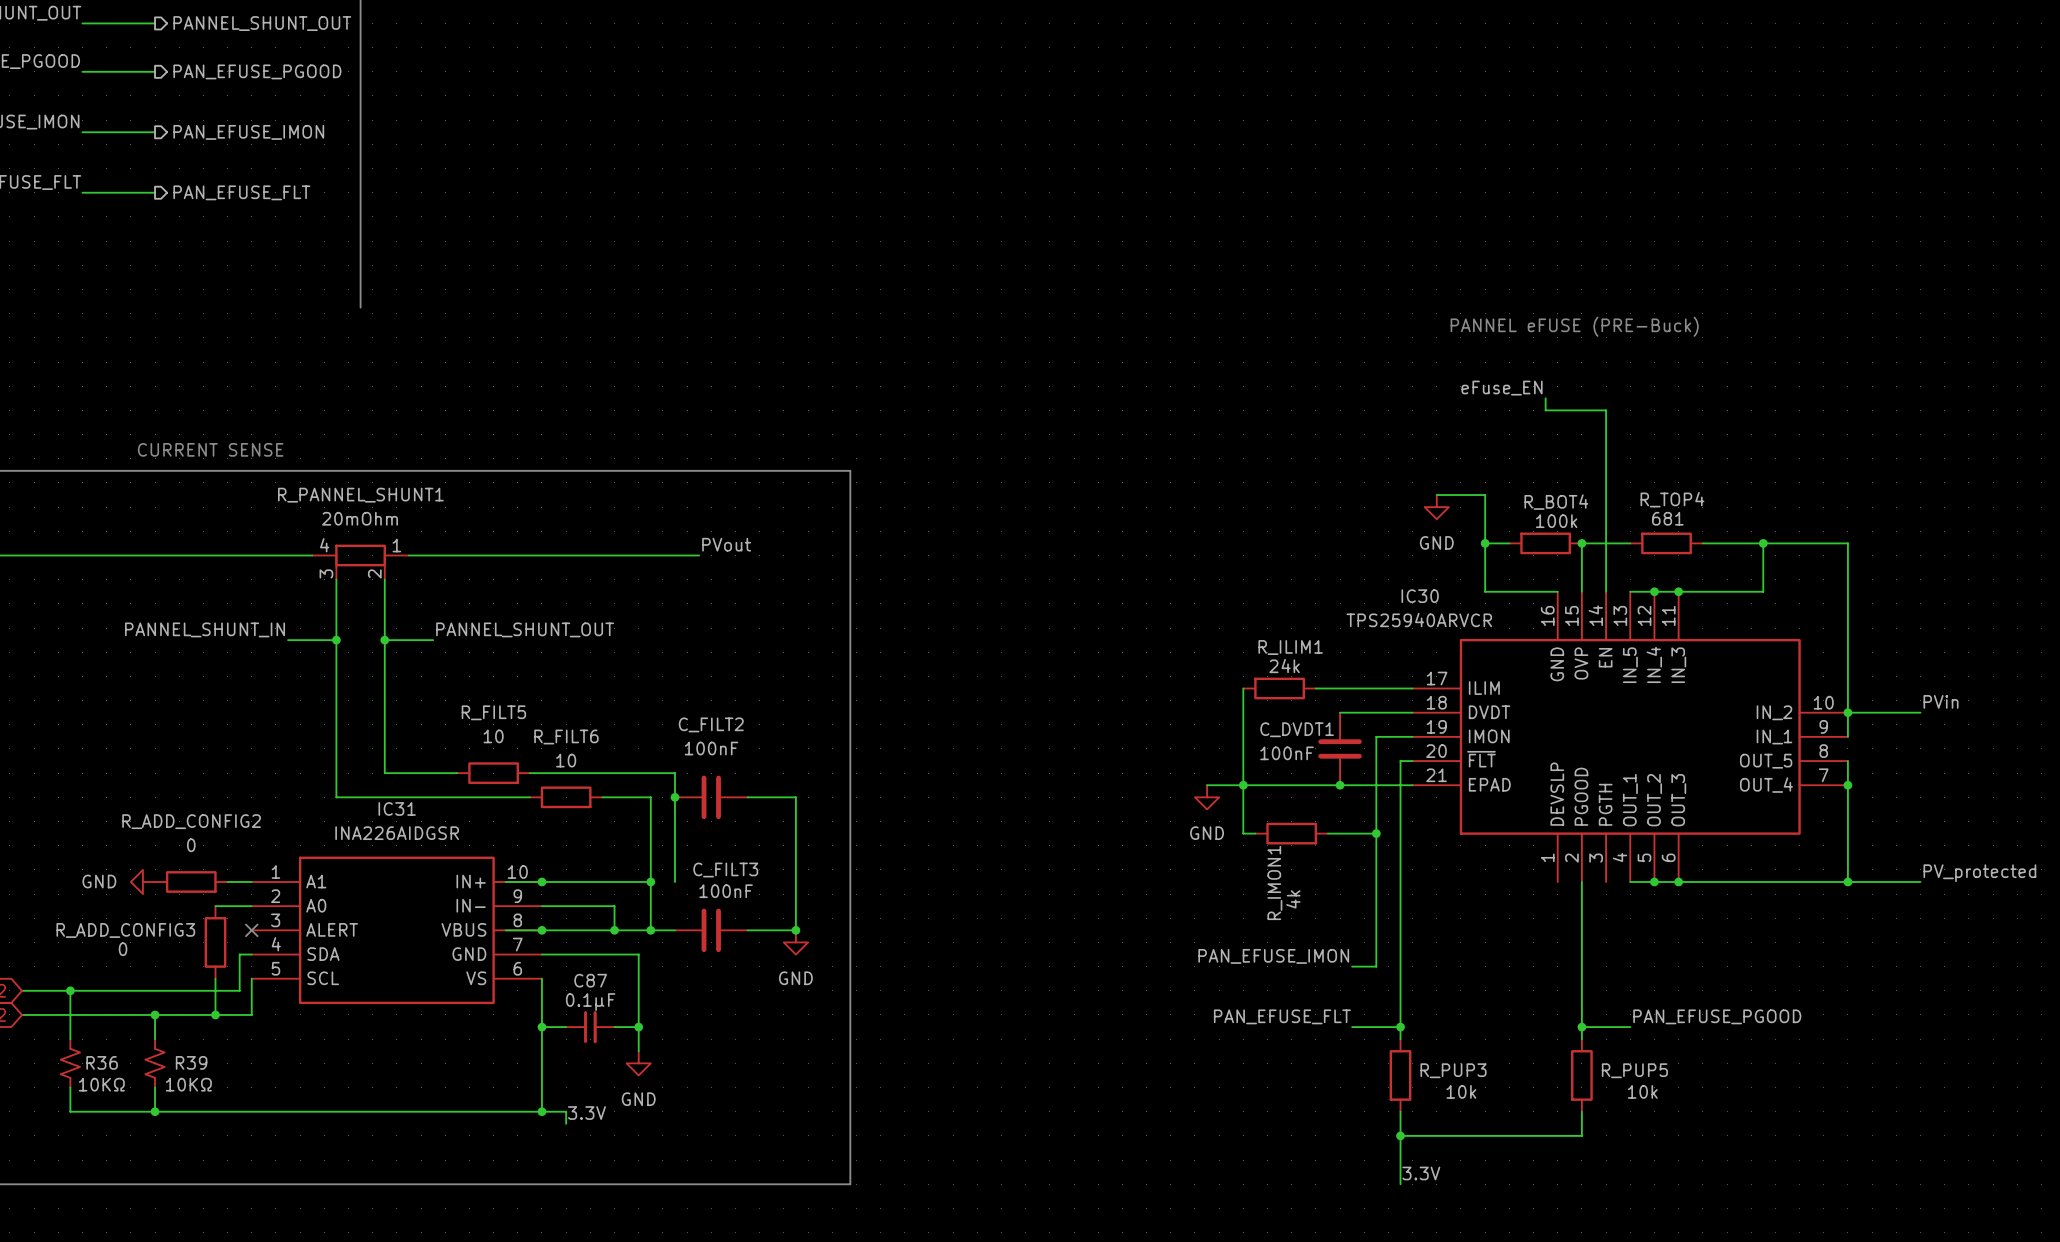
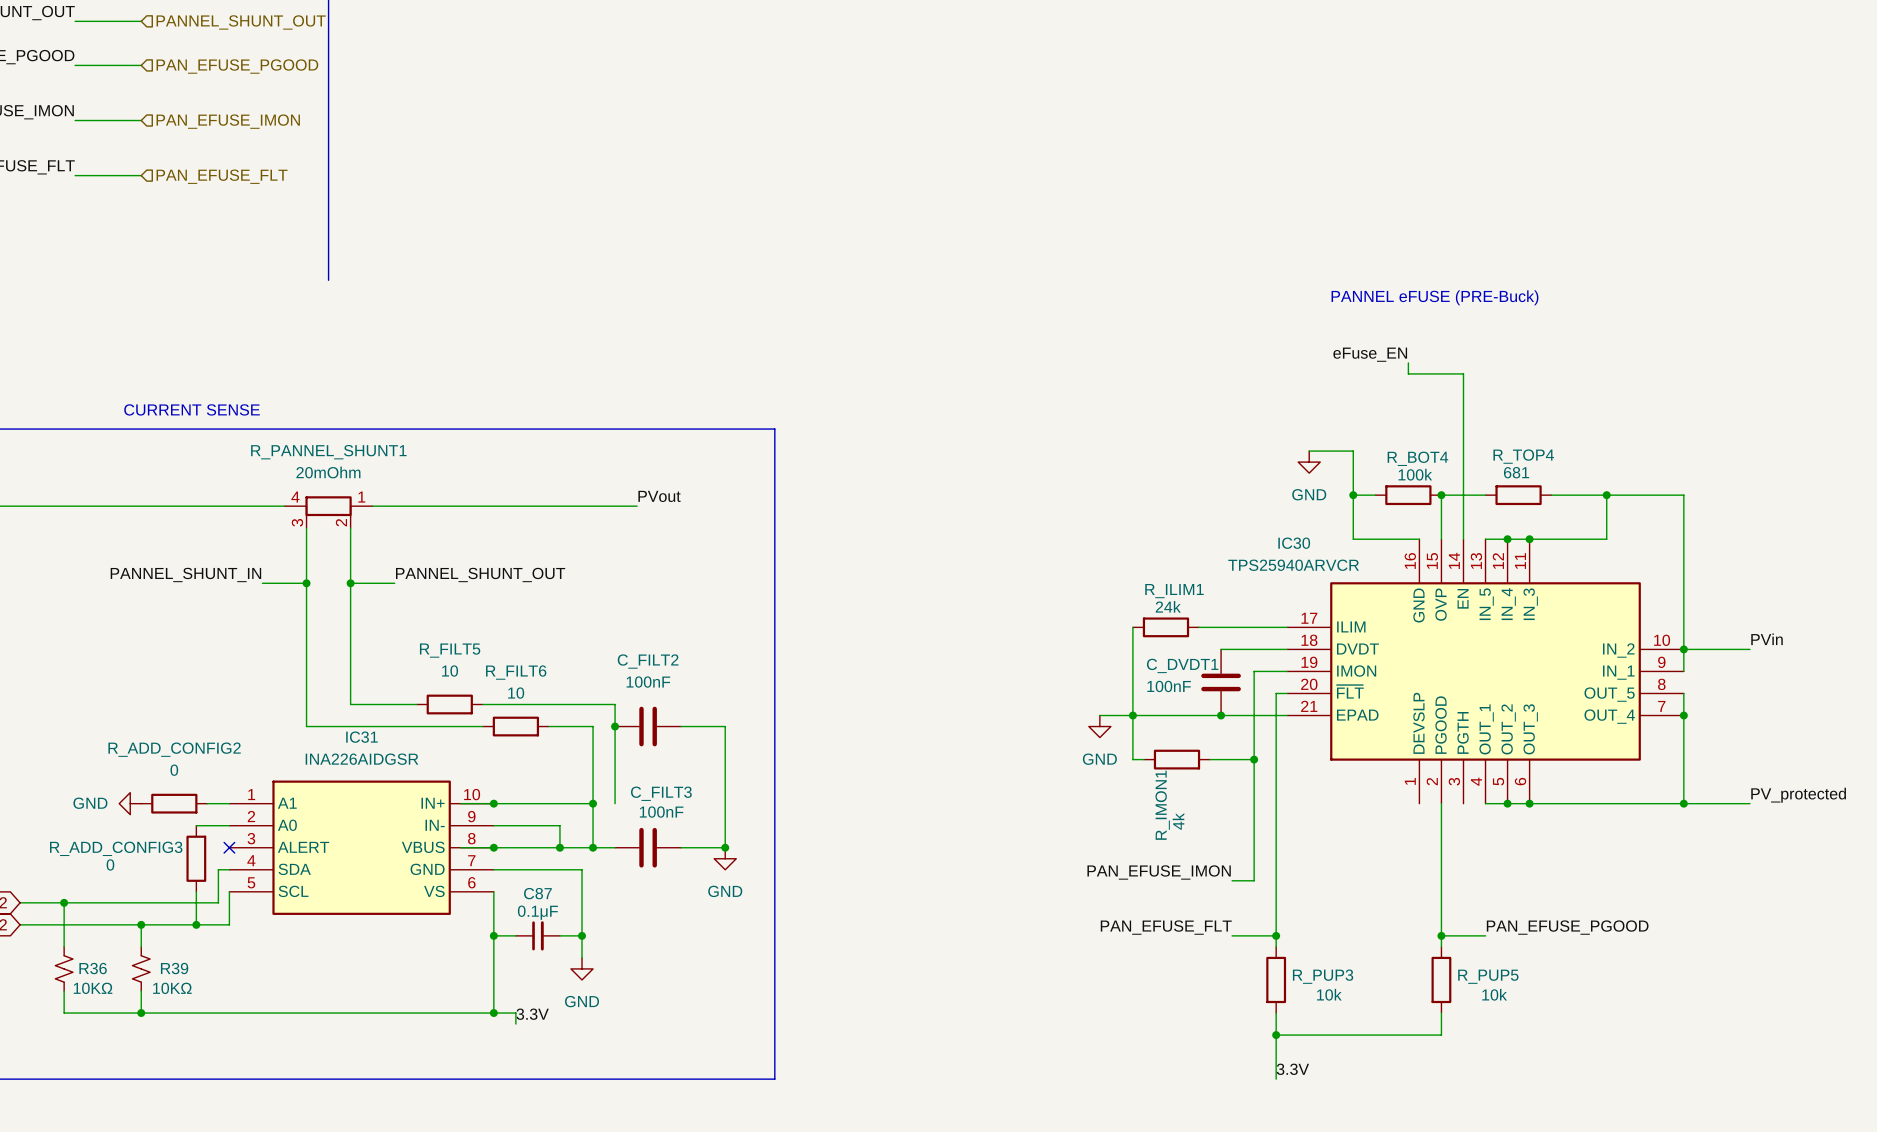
hierarchical label shape: output (262, 23) -> input (241, 22)
hierarchical label shape: output (257, 71) -> input (237, 66)
hierarchical label shape: output (248, 132) -> input (228, 121)
hierarchical label shape: output (241, 192) -> input (222, 176)

